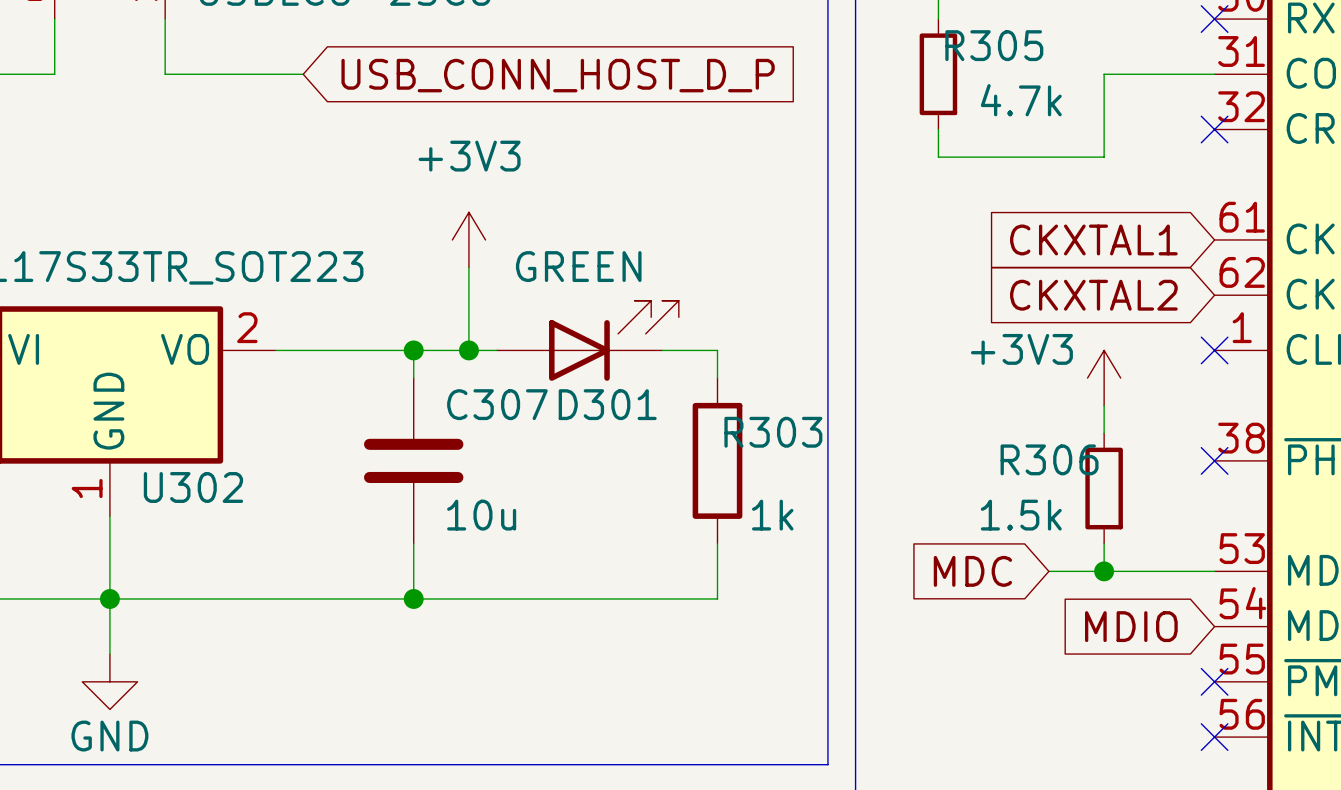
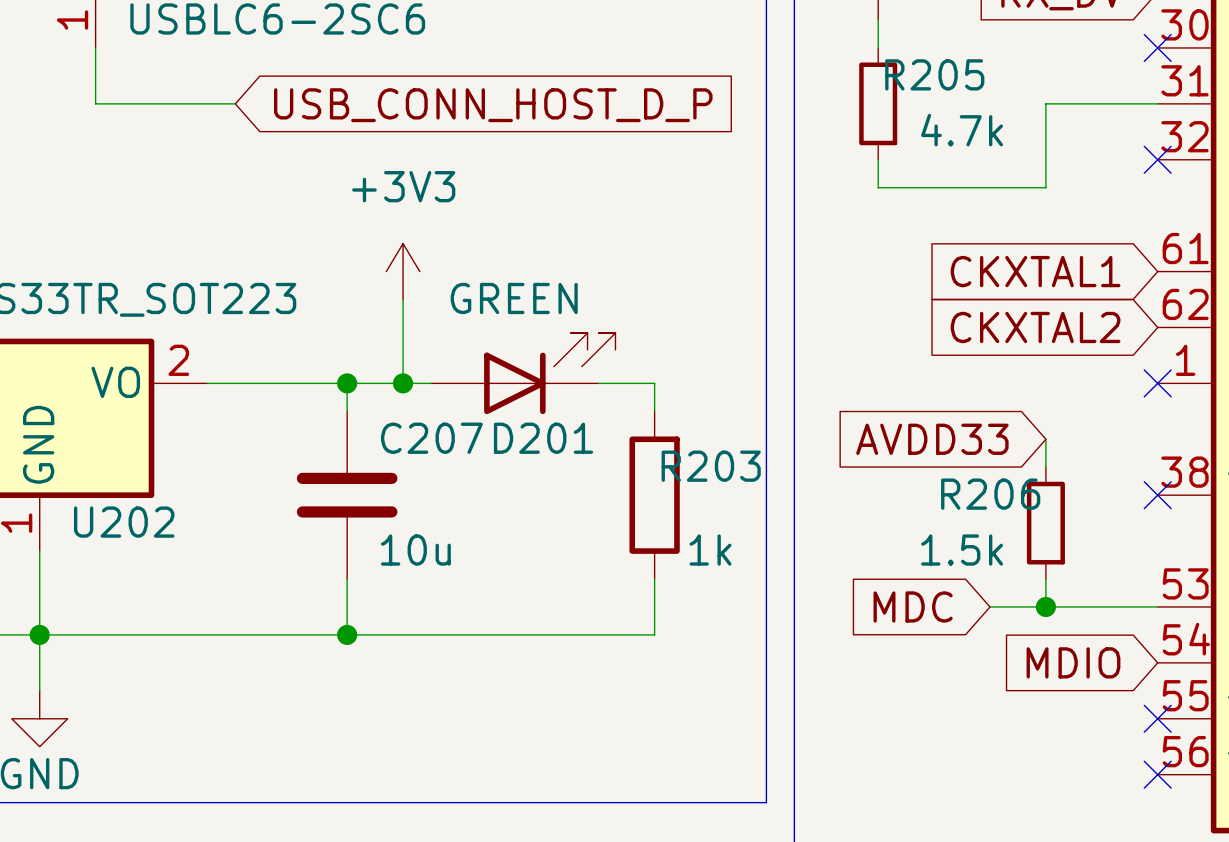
R305 name: R305 (994, 45) -> R205 (934, 74)
power symbol: +3V3 (1104, 378) -> none
C307 name: C307 (497, 404) -> C207 (431, 438)
D301 name: D301 (607, 404) -> D201 (543, 438)
global label: none -> AVDD33 (932, 439)
R303 name: R303 (773, 432) -> R203 (711, 466)
R306 name: R306 (1049, 459) -> R206 (990, 494)
U302 name: U302 (193, 487) -> U202 (124, 522)

